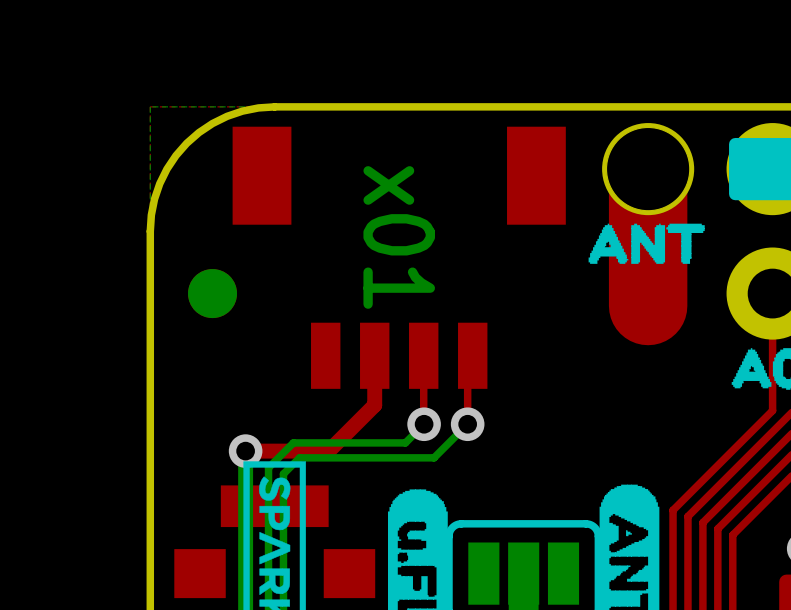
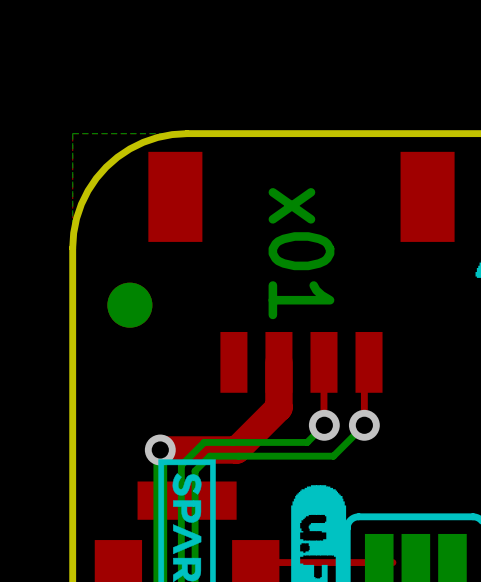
top track width: thin (374, 355) (374, 405) (328, 451) (245, 451) -> thick (278, 362) (278, 407) (236, 449) (160, 449)
top track: none -> (392, 562) (255, 562)

